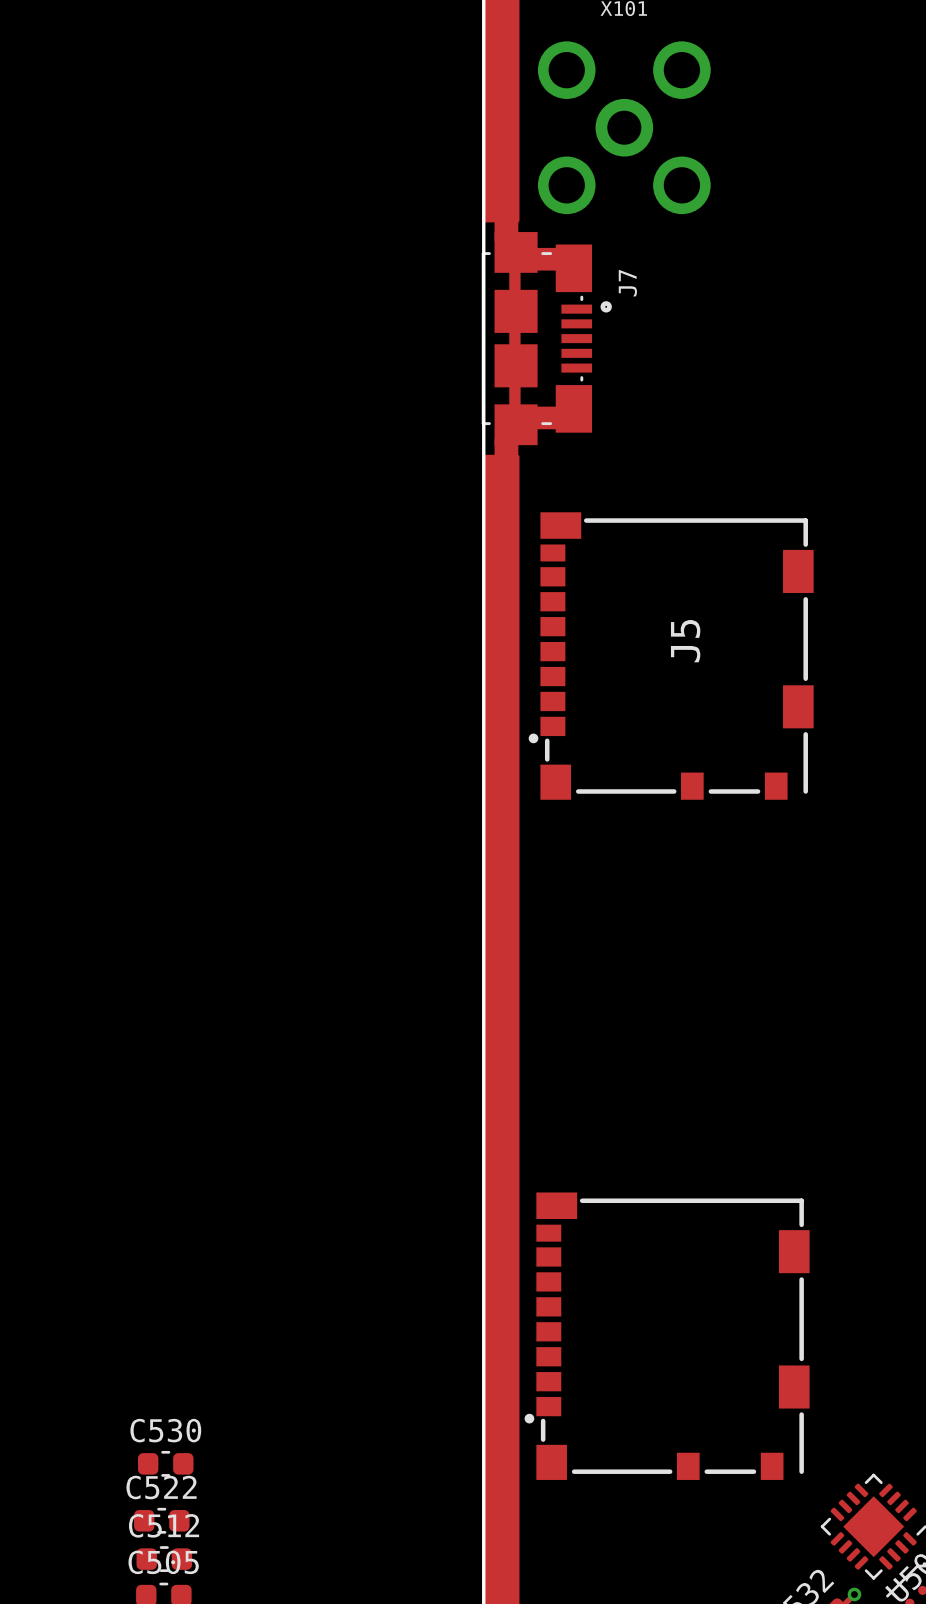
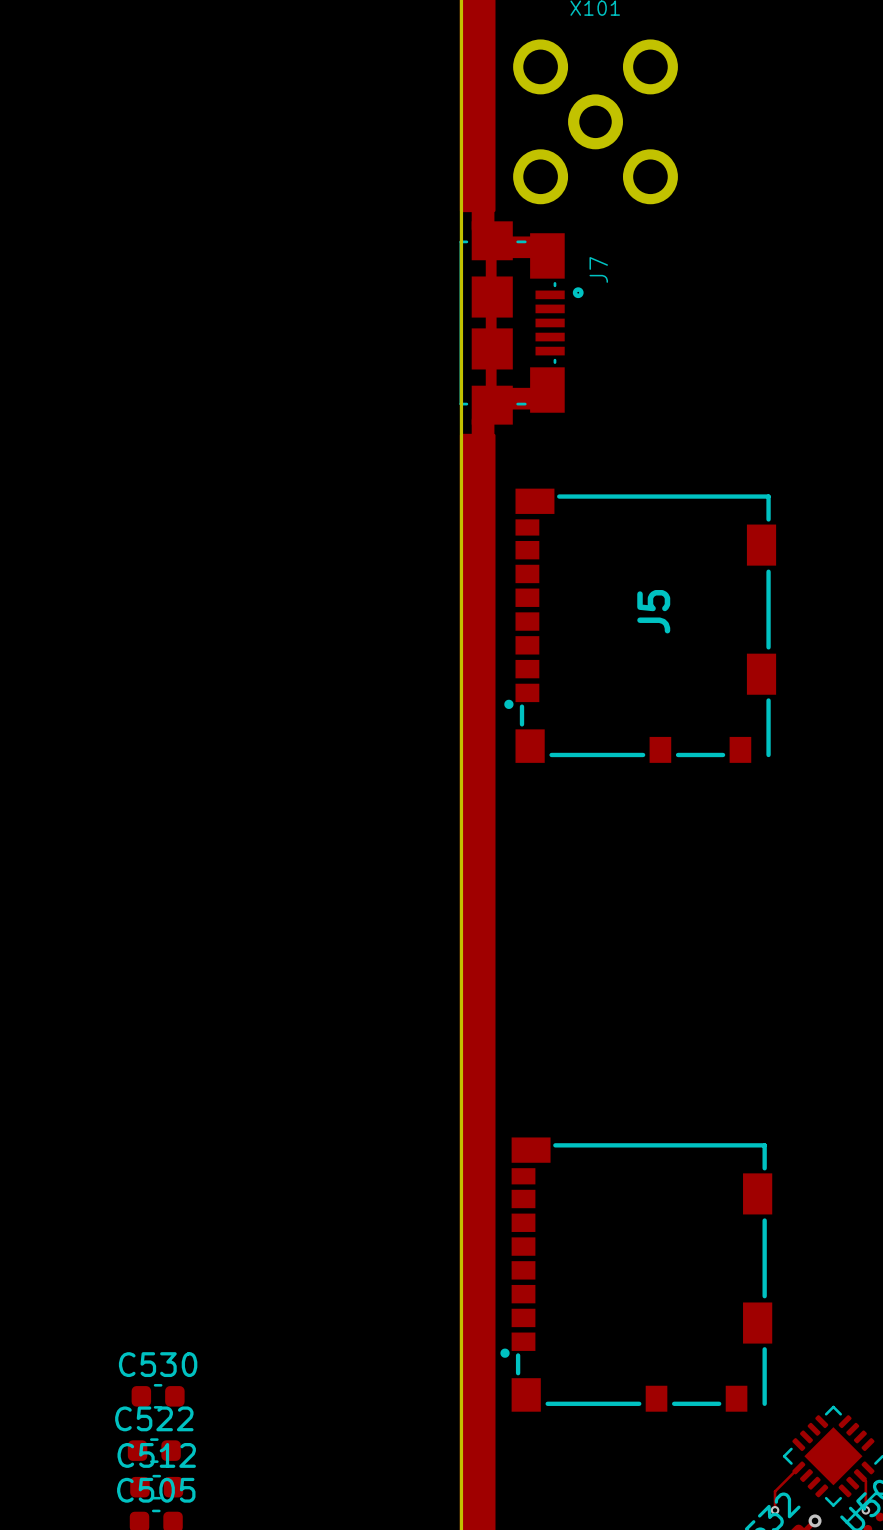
track: none -> (798, 1467) (775, 1491) (775, 1510)
track: none -> (860, 1475) (865, 1481) (865, 1510)
via: none -> (775, 1510)
via: none -> (865, 1510)

